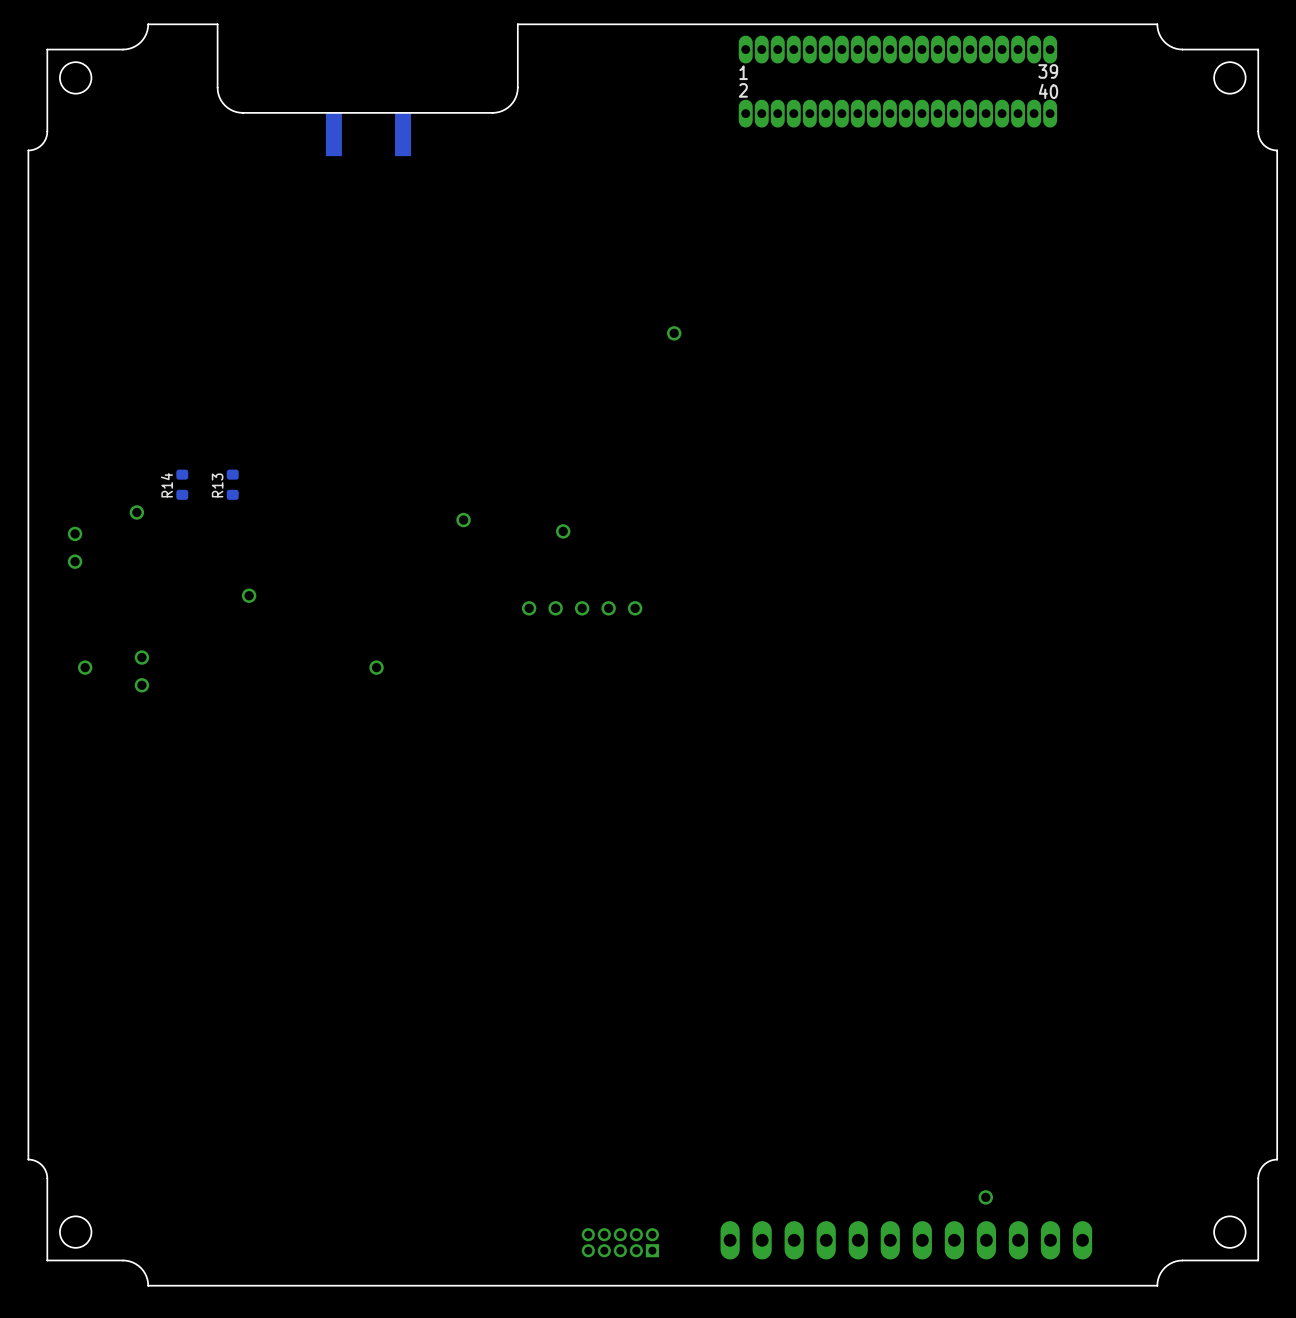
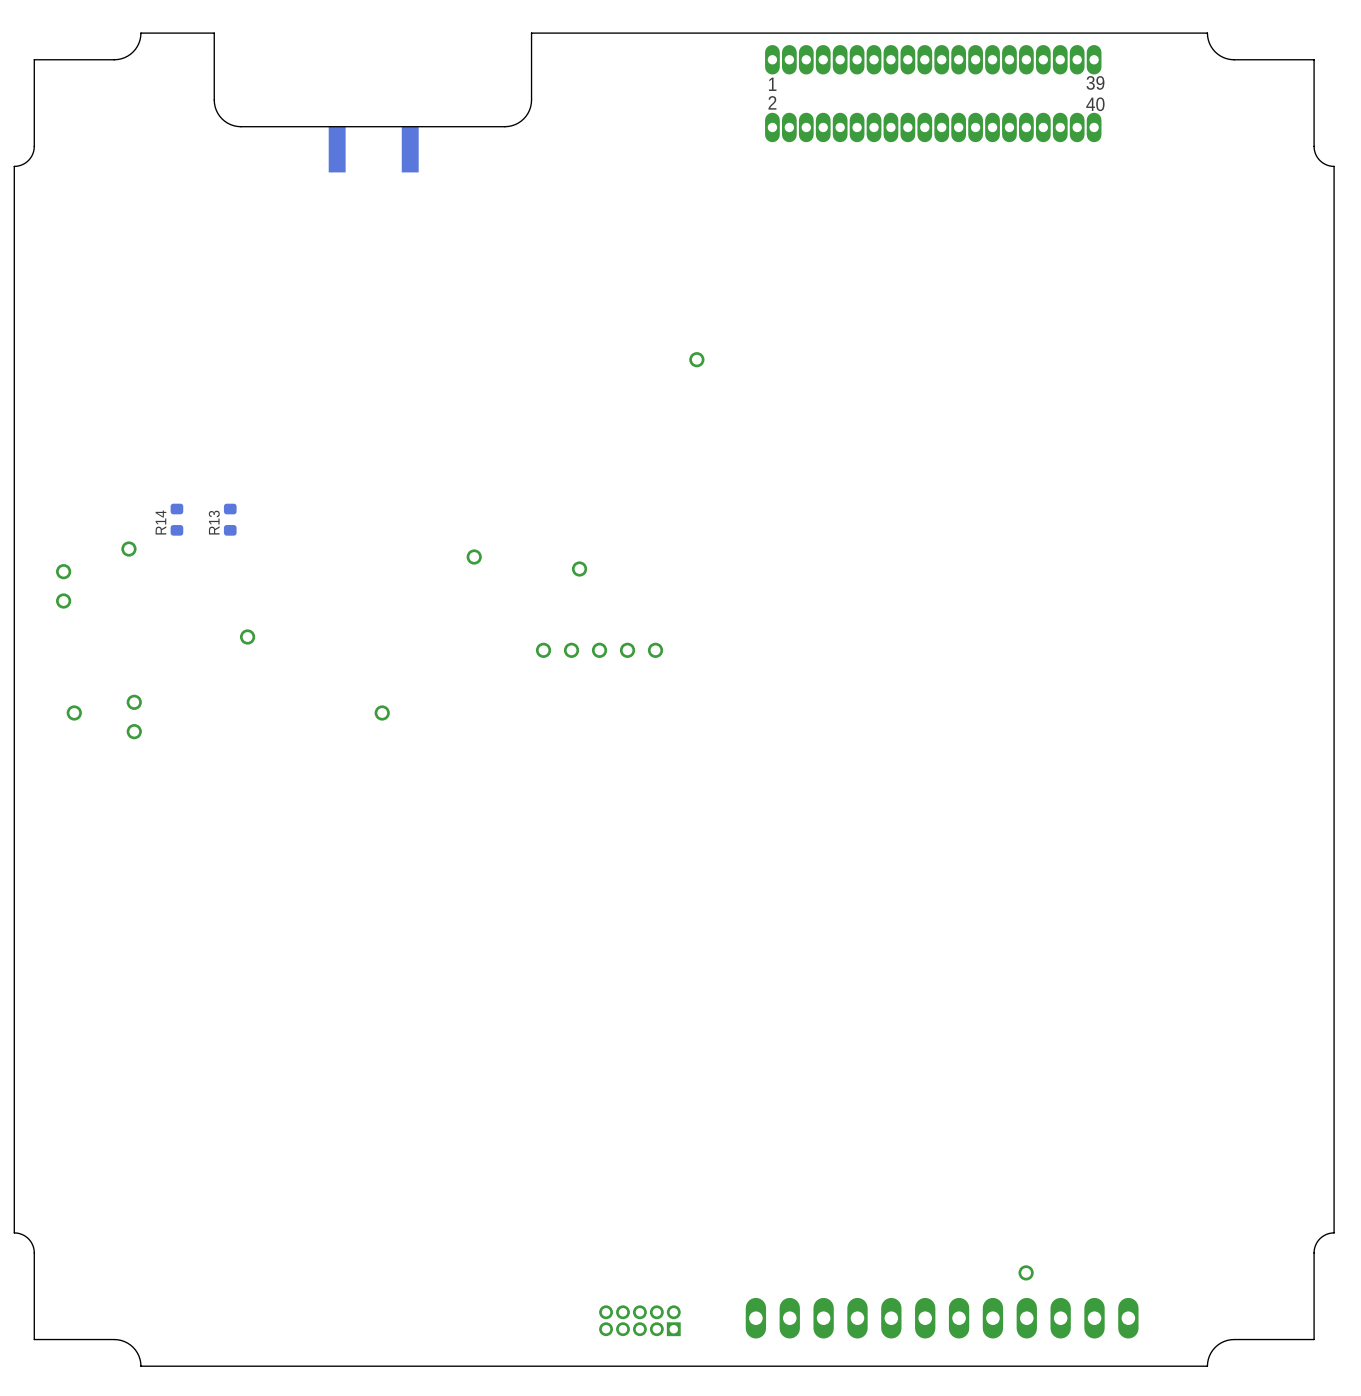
part: (652, 655) -> none

